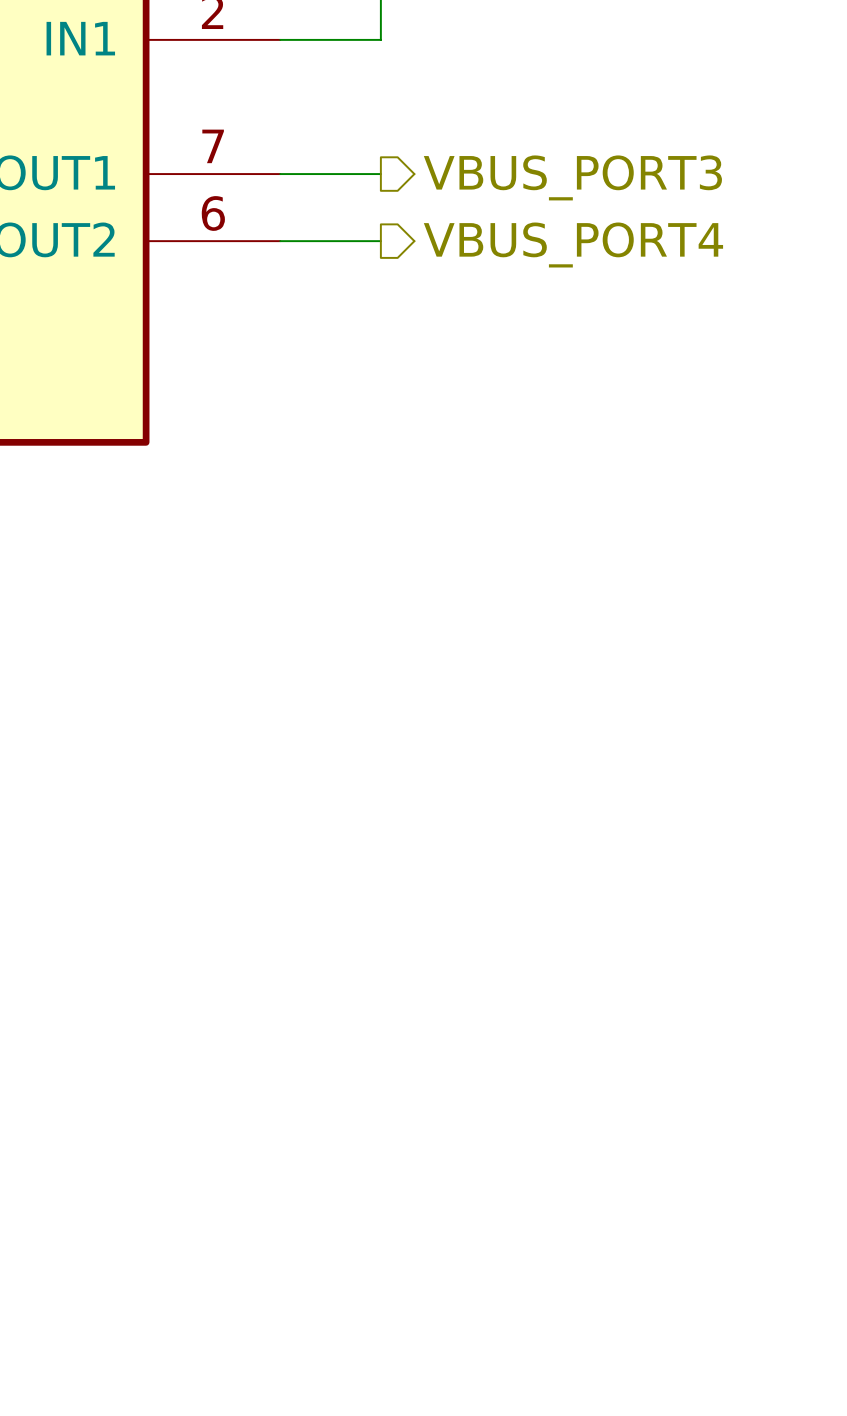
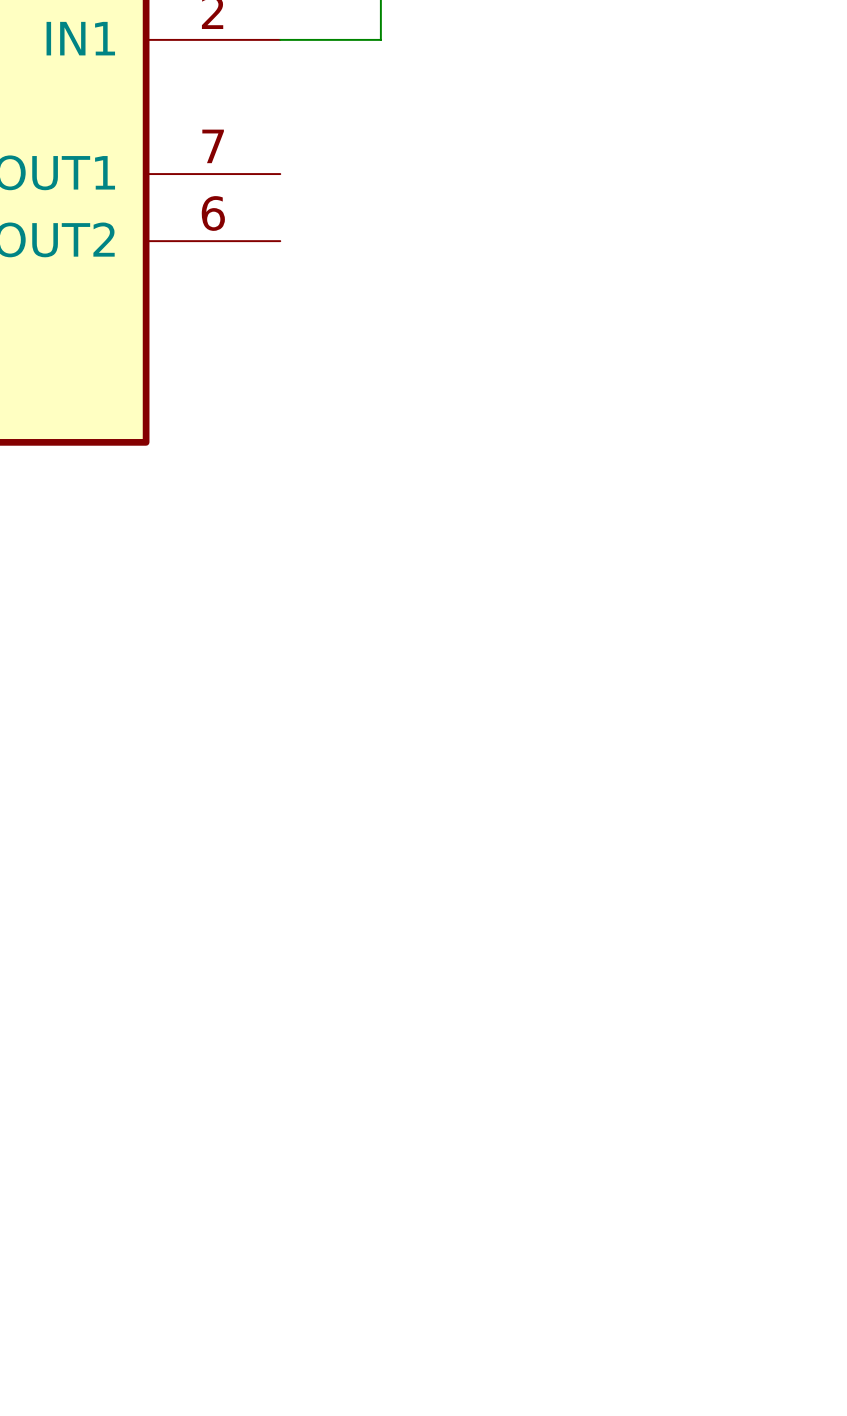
wire: (280, 174) (380, 174) -> none
hierarchical label: VBUS_PORT3 (572, 177) -> none
wire: (280, 241) (380, 241) -> none
hierarchical label: VBUS_PORT4 (573, 245) -> none

